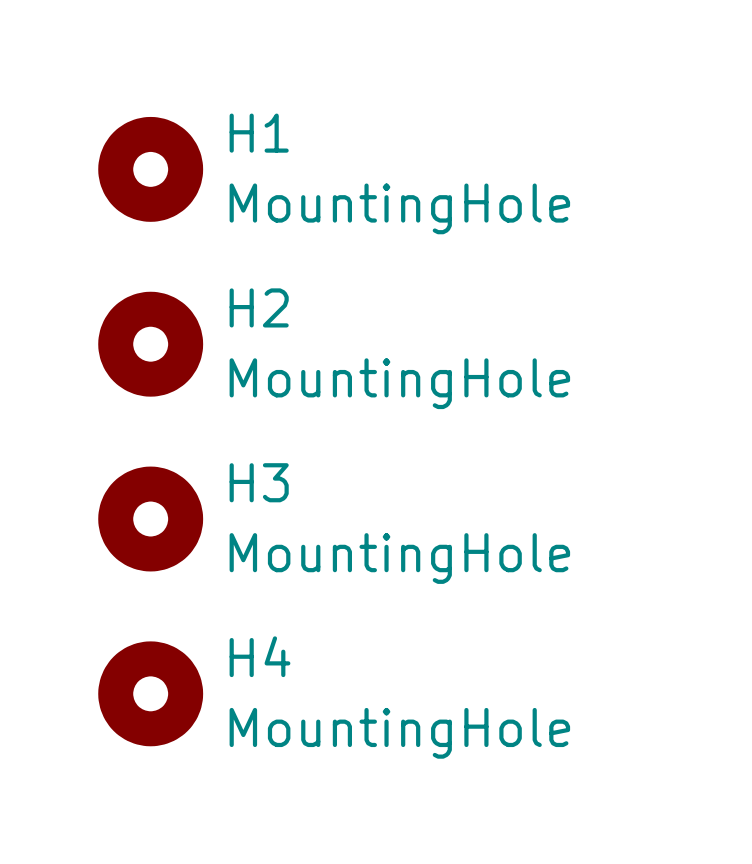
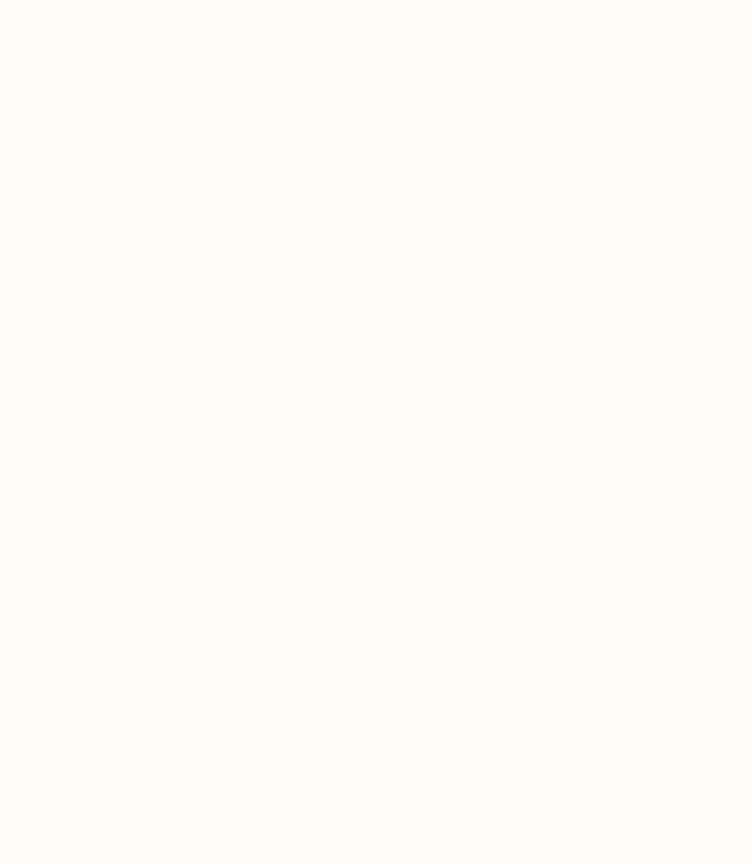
H1: MountingHole (150, 169) -> none
H2: MountingHole (150, 344) -> none
H3: MountingHole (150, 519) -> none
H4: MountingHole (150, 693) -> none

